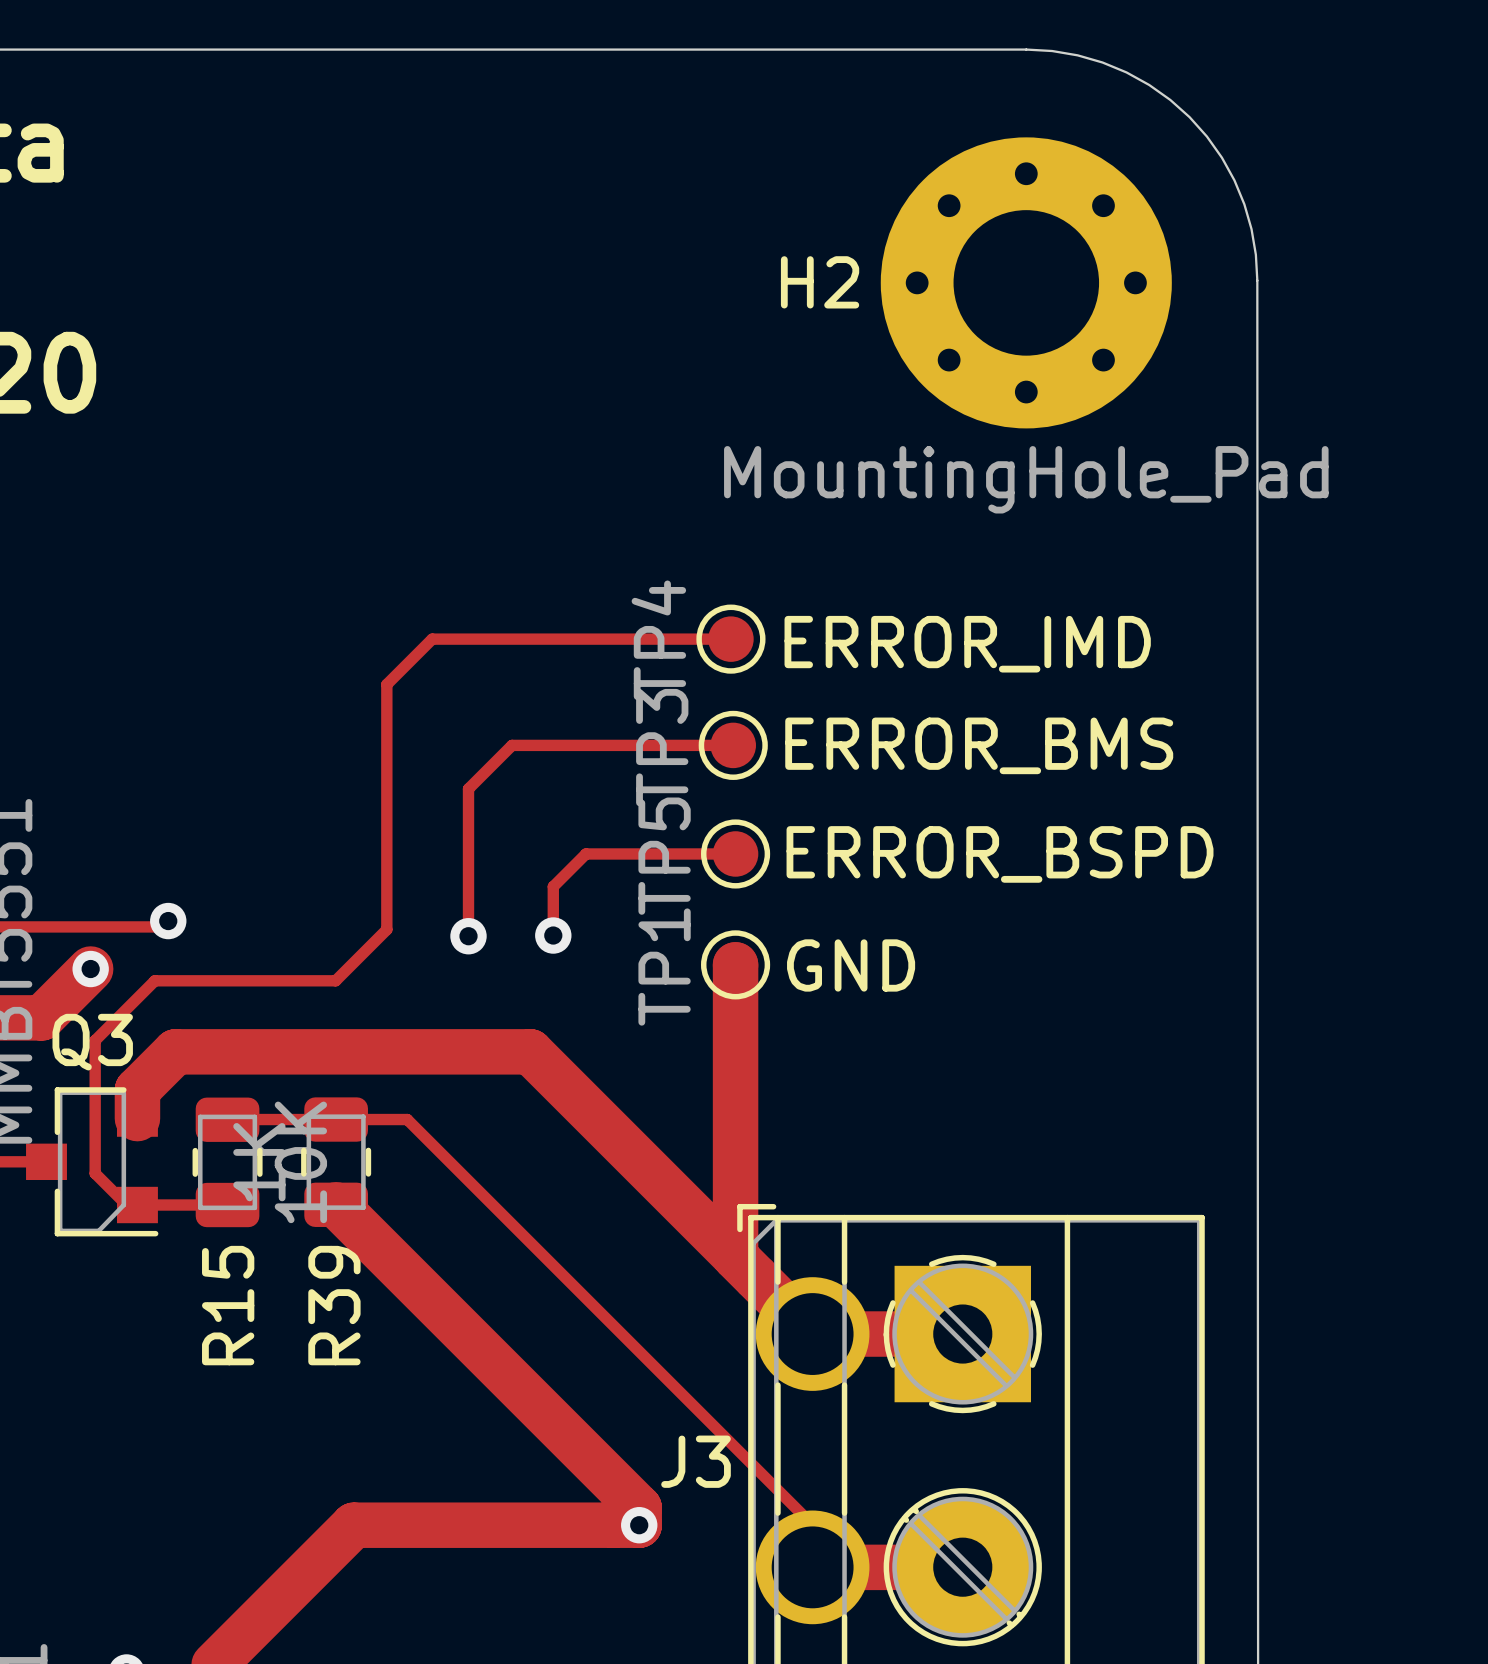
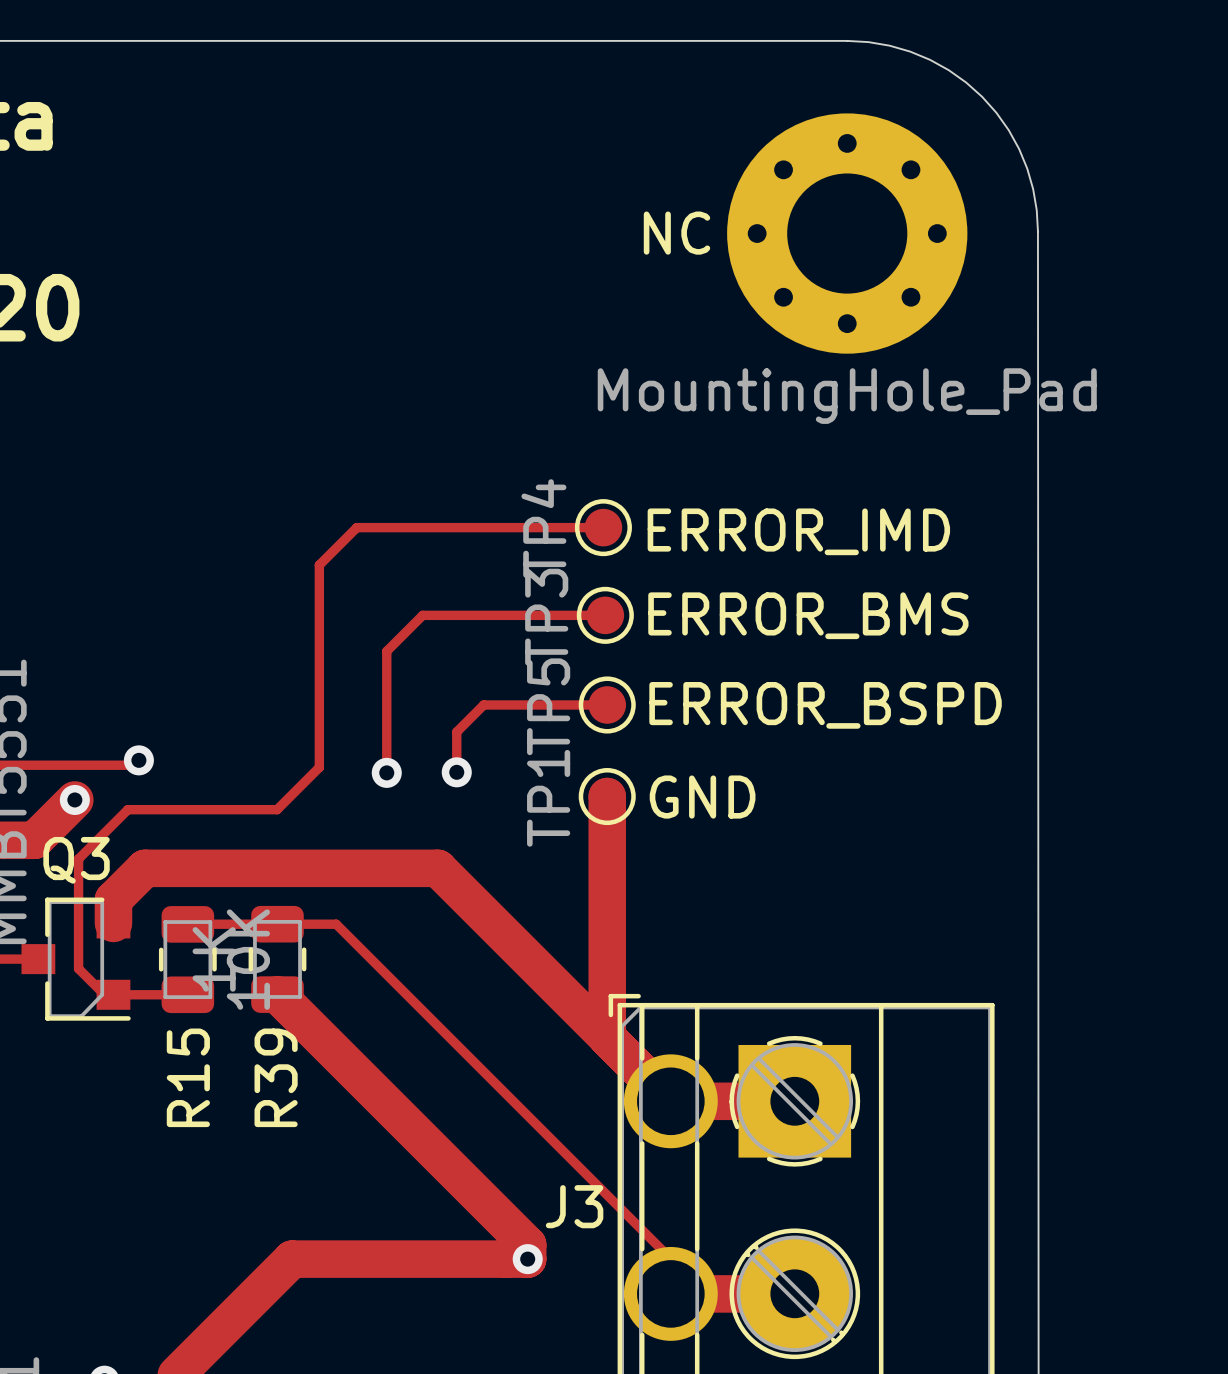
H2 name: H2 (820, 282) -> NC (676, 233)

